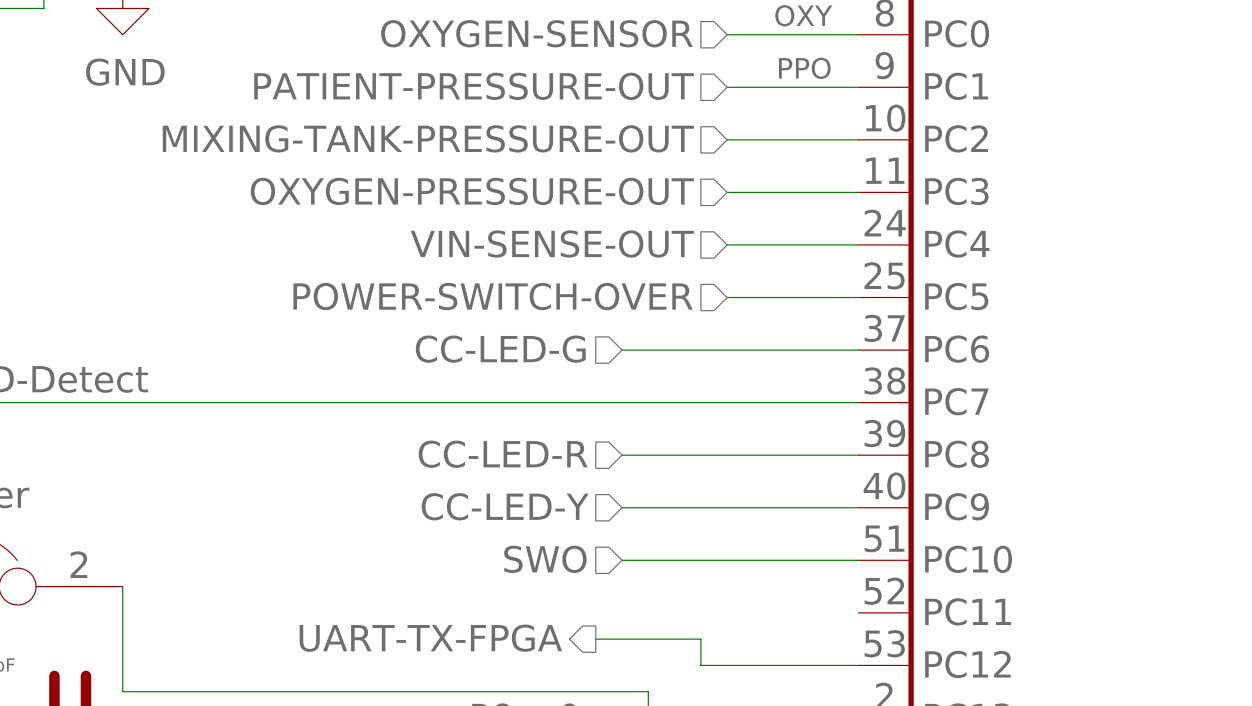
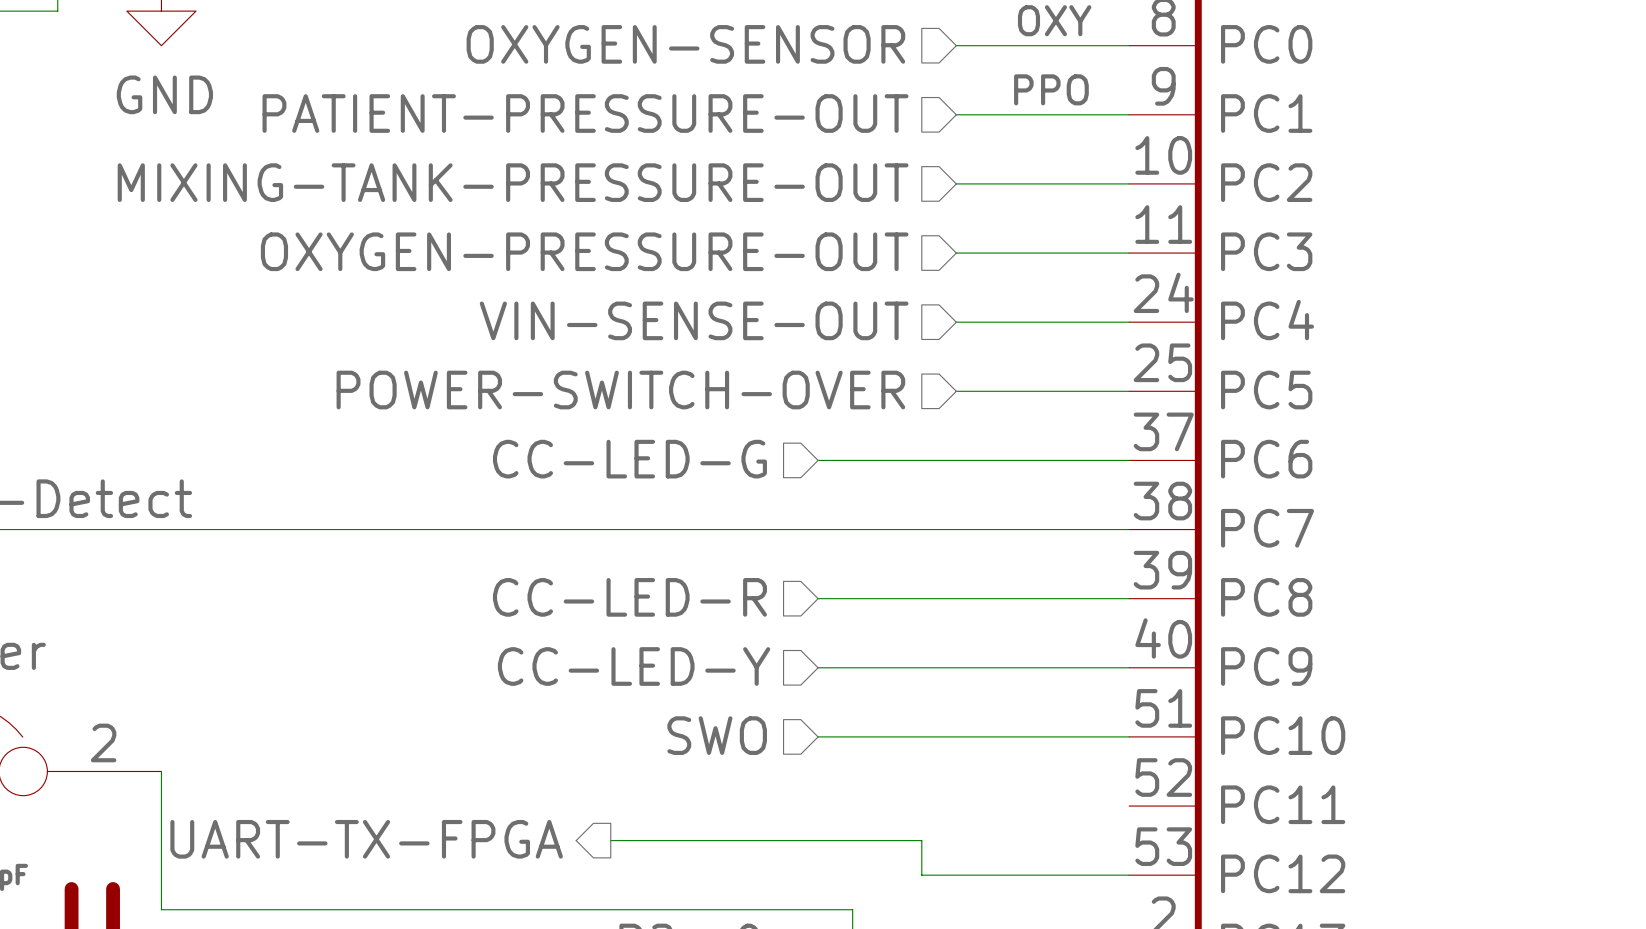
hierarchical label position: UART-TX-FPGA (430, 638) -> UART-TX-FPGA (366, 839)
wire: none -> (610, 840) (783, 840)

